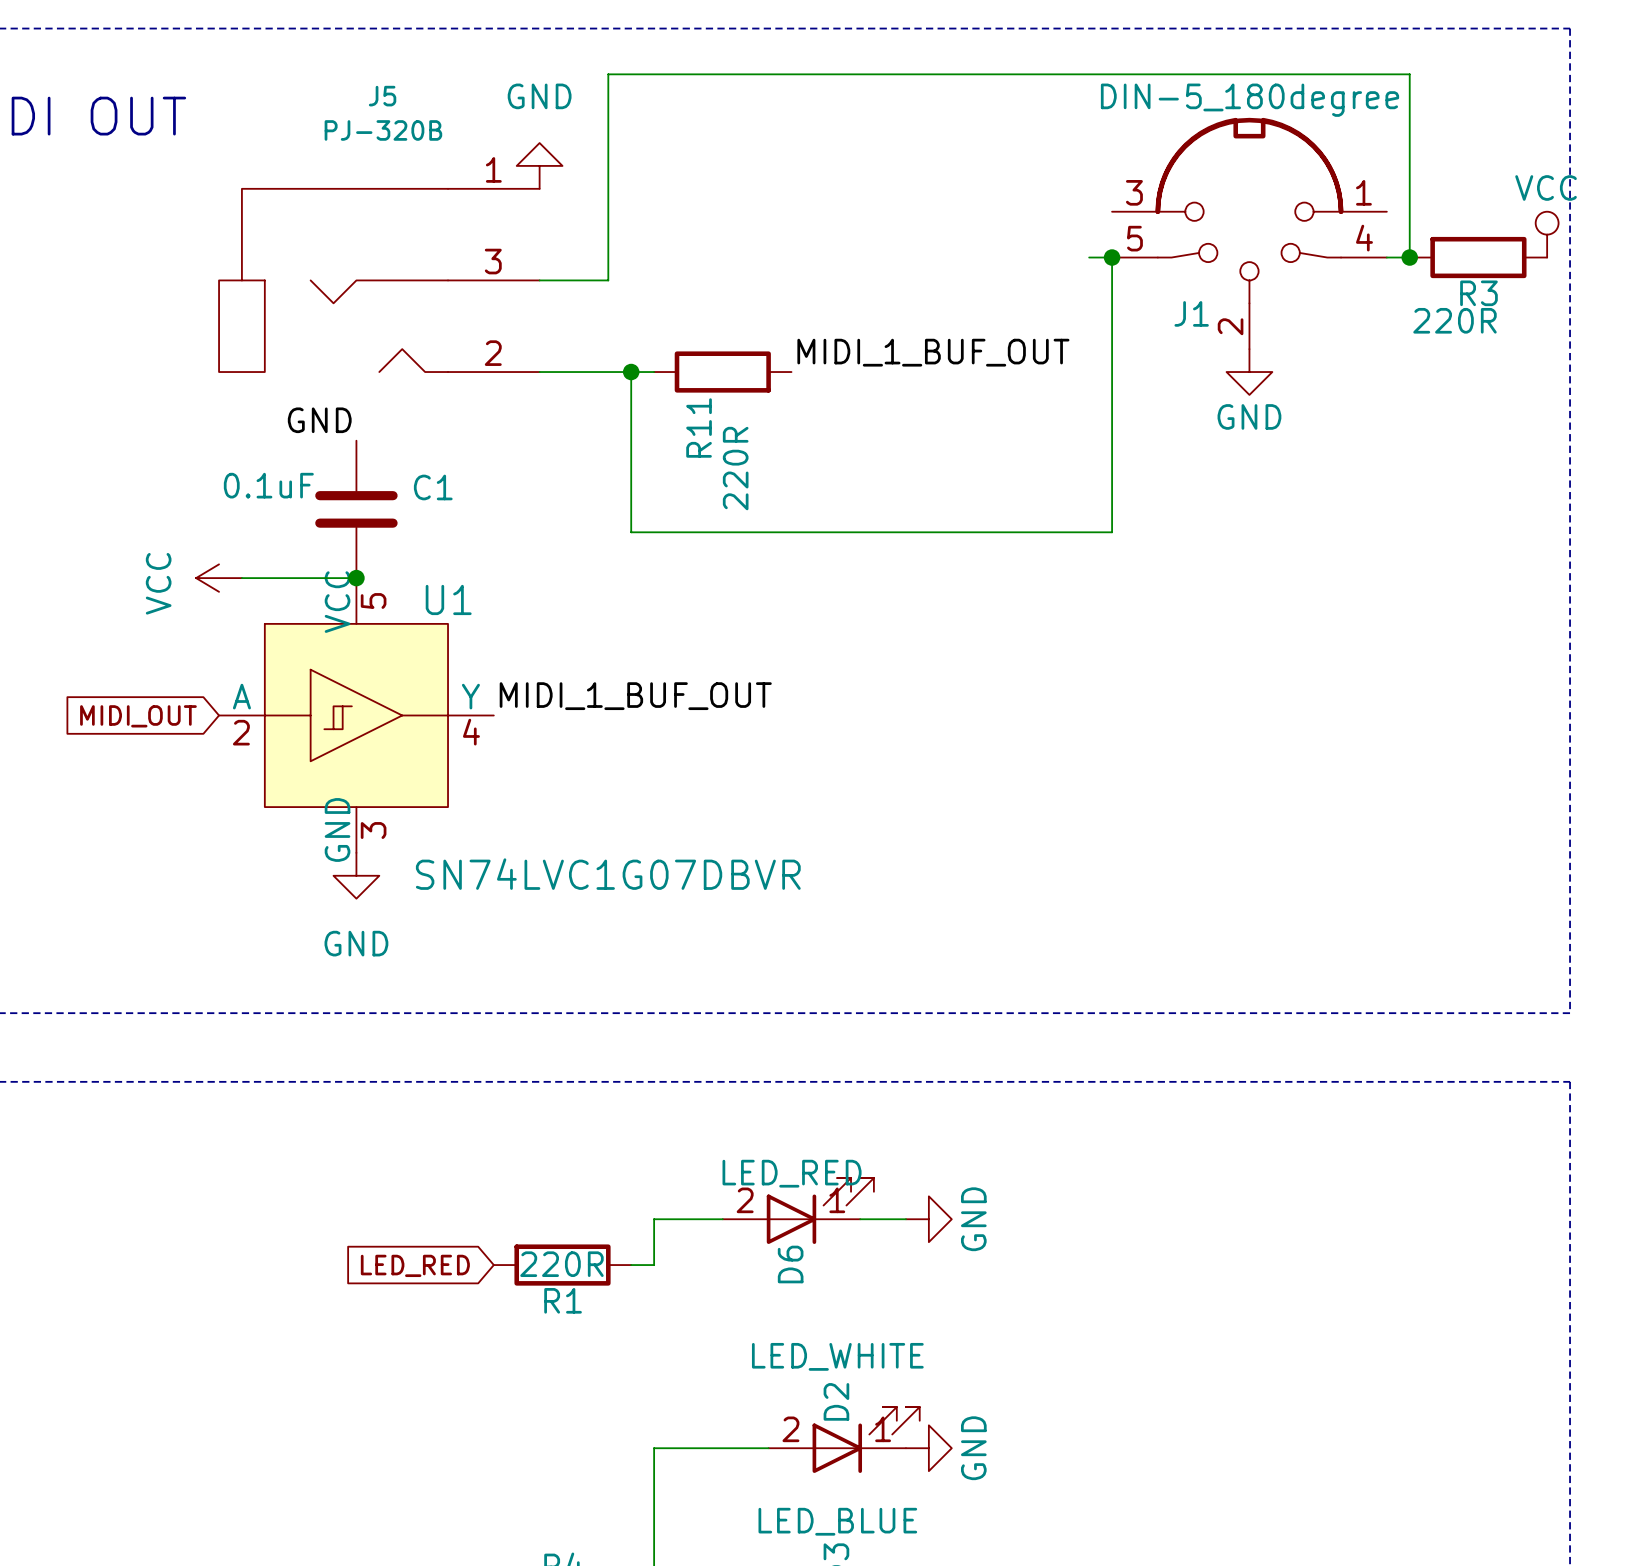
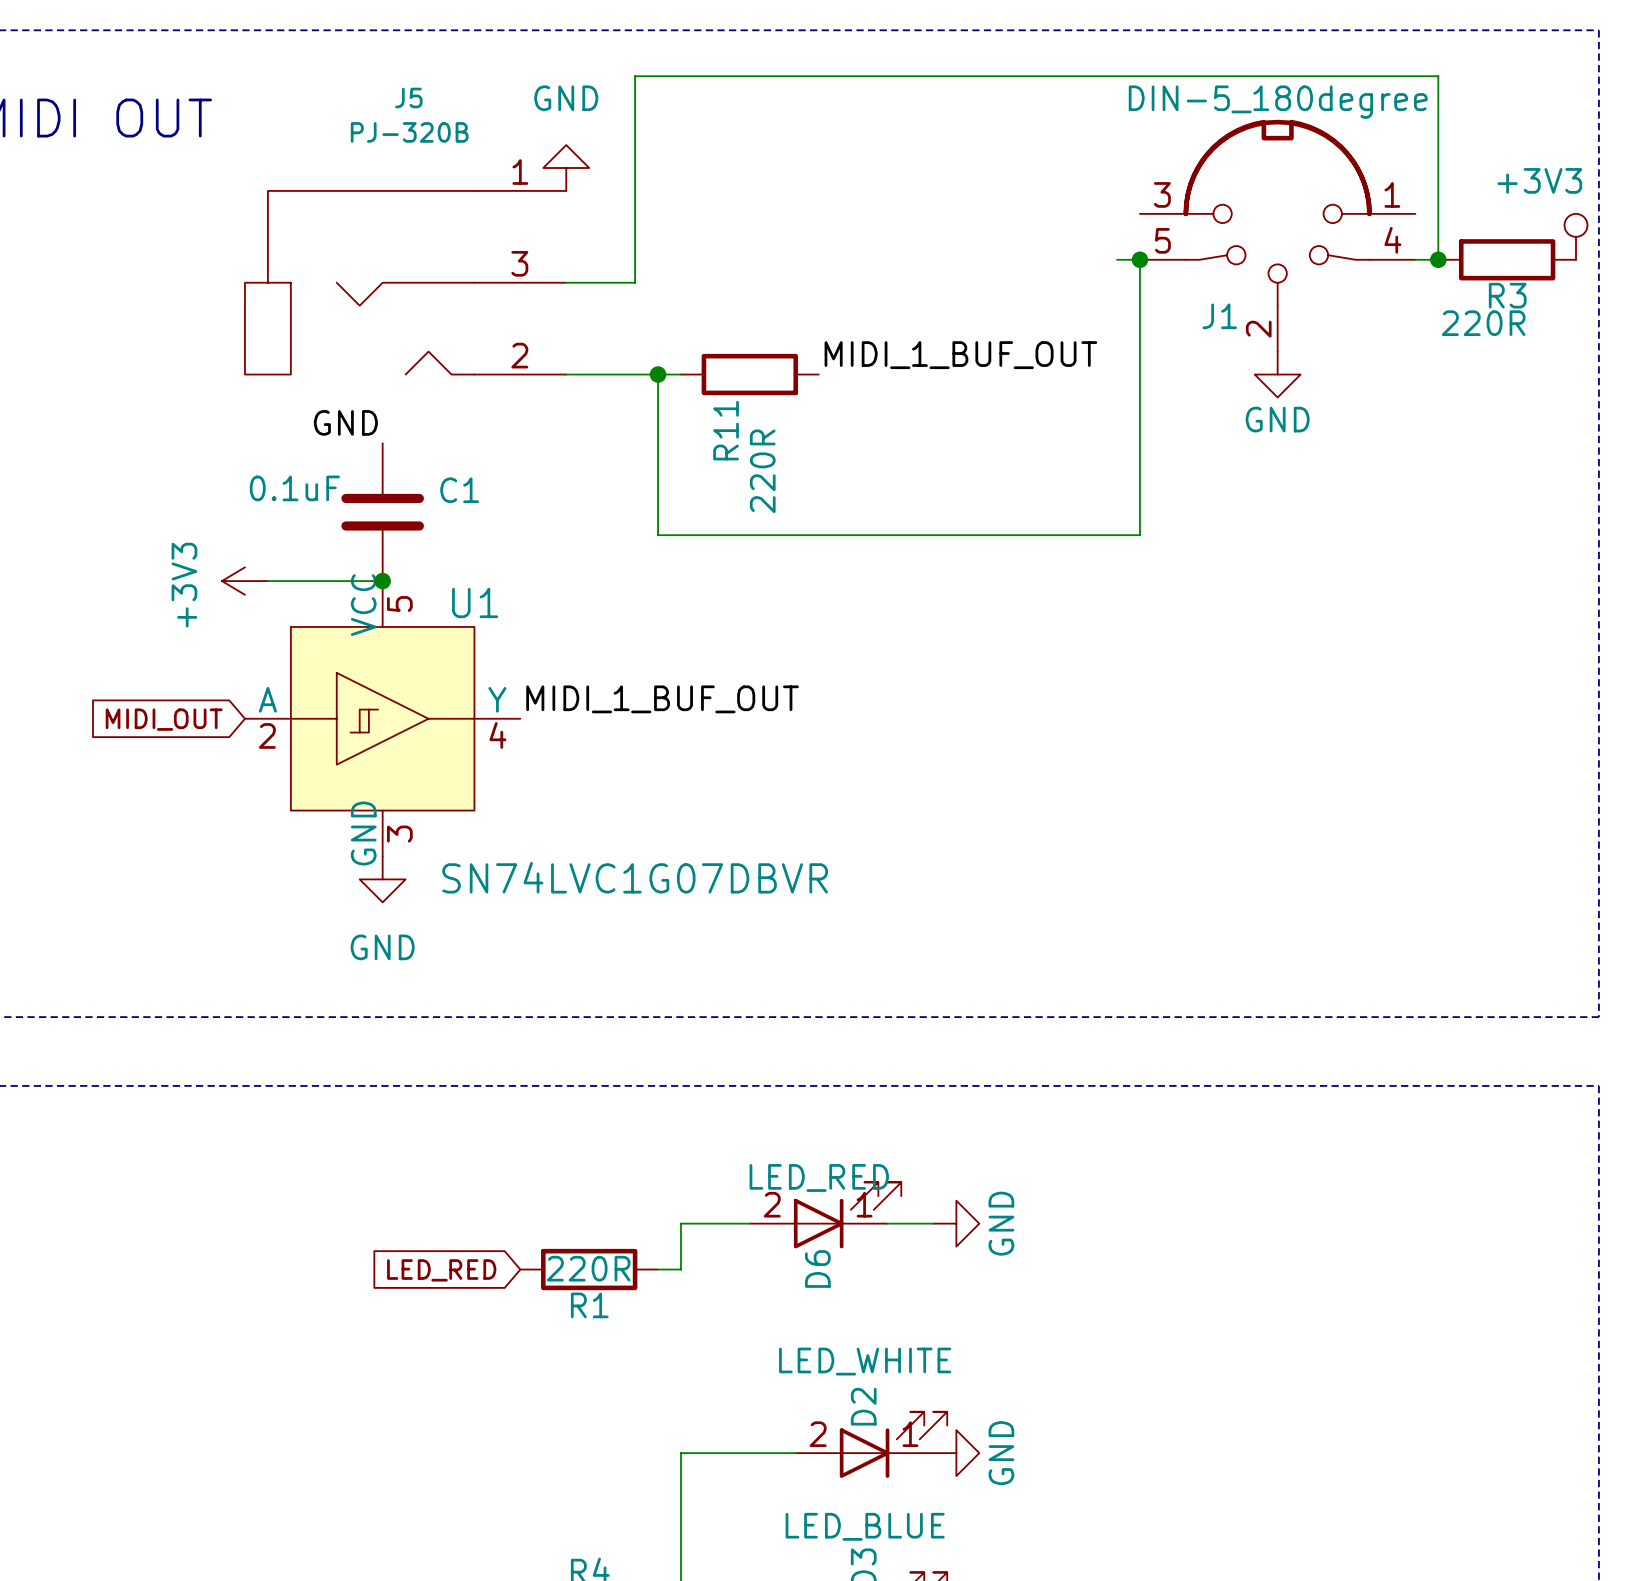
power symbol: VCC (1547, 234) -> +3V3 (1575, 236)
power symbol: VCC (219, 578) -> +3V3 (244, 581)

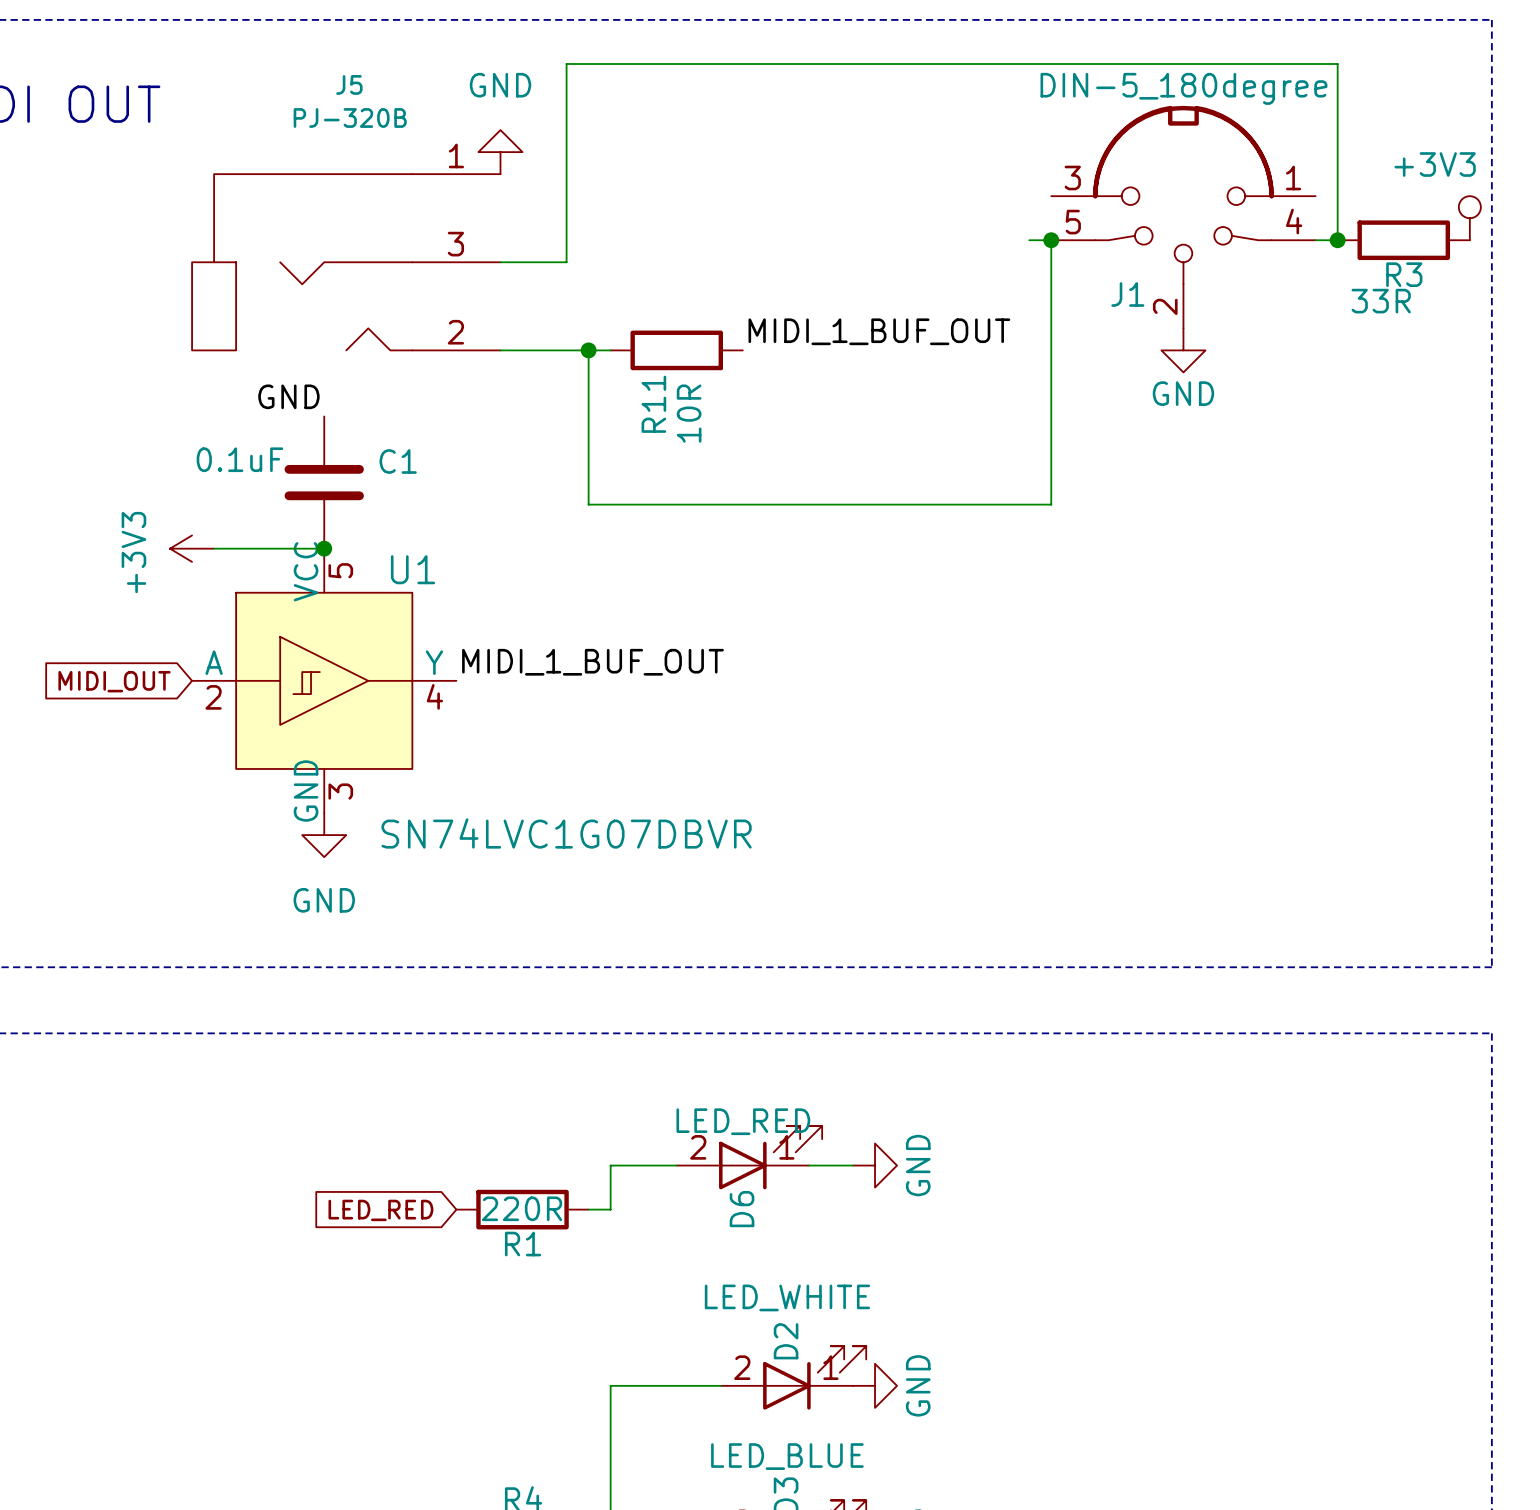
R3 value: 220R (1483, 323) -> 33R (1381, 301)
R11 value: 220R (762, 471) -> 10R (689, 413)

